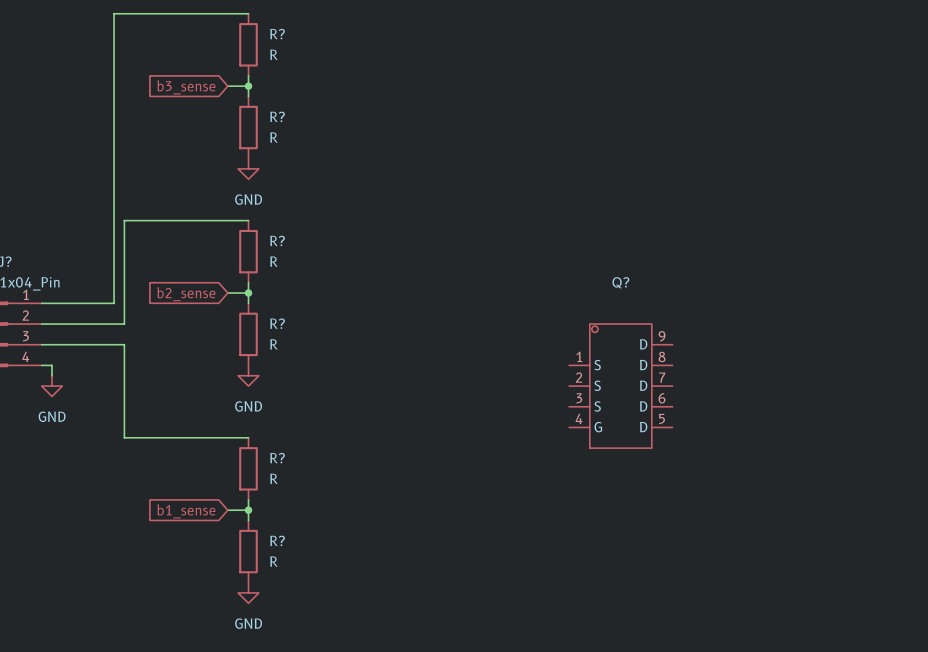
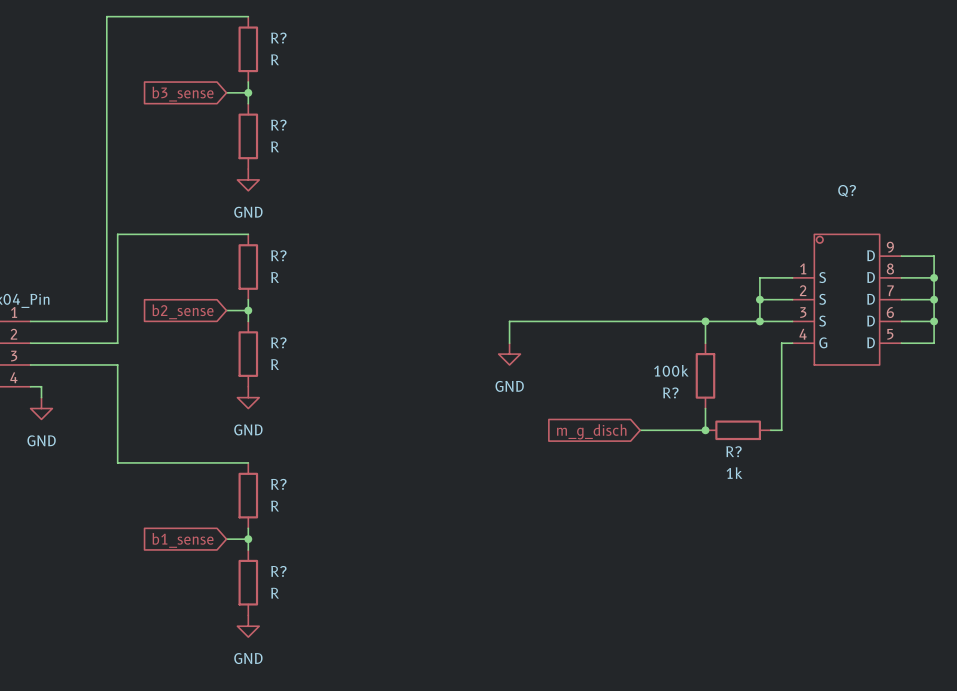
wire: none -> (901, 256) (934, 256) (934, 343) (901, 343)
wire: none -> (792, 277) (759, 277) (759, 321)
wire: none -> (901, 277) (934, 277)
junction: none -> (934, 277)
wire: none -> (759, 299) (792, 299)
junction: none -> (759, 299)
Q?: none -> (847, 299)
wire: none -> (901, 299) (934, 299)
junction: none -> (934, 299)
wire: none -> (705, 321) (705, 343)
junction: none -> (705, 321)
junction: none -> (759, 321)
wire: none -> (792, 321) (509, 321) (509, 343)
wire: none -> (901, 321) (934, 321)
junction: none -> (934, 321)
wire: none -> (792, 343) (781, 343) (781, 430) (770, 430)
power symbol: none -> GND (509, 354)
R?: none -> 100k (705, 375)
Q?: (620, 386) -> none
wire: none -> (705, 408) (705, 430) (640, 430)
junction: none -> (705, 430)
R?: none -> 1k (738, 430)
global label: none -> m_g_disch (591, 431)

